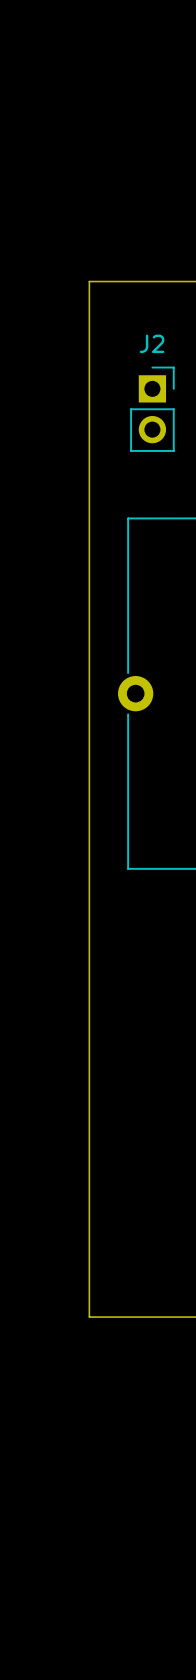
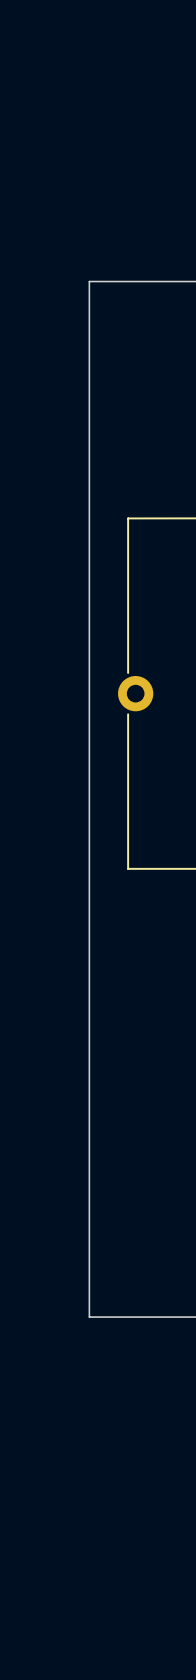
J2: (152, 409) -> none

